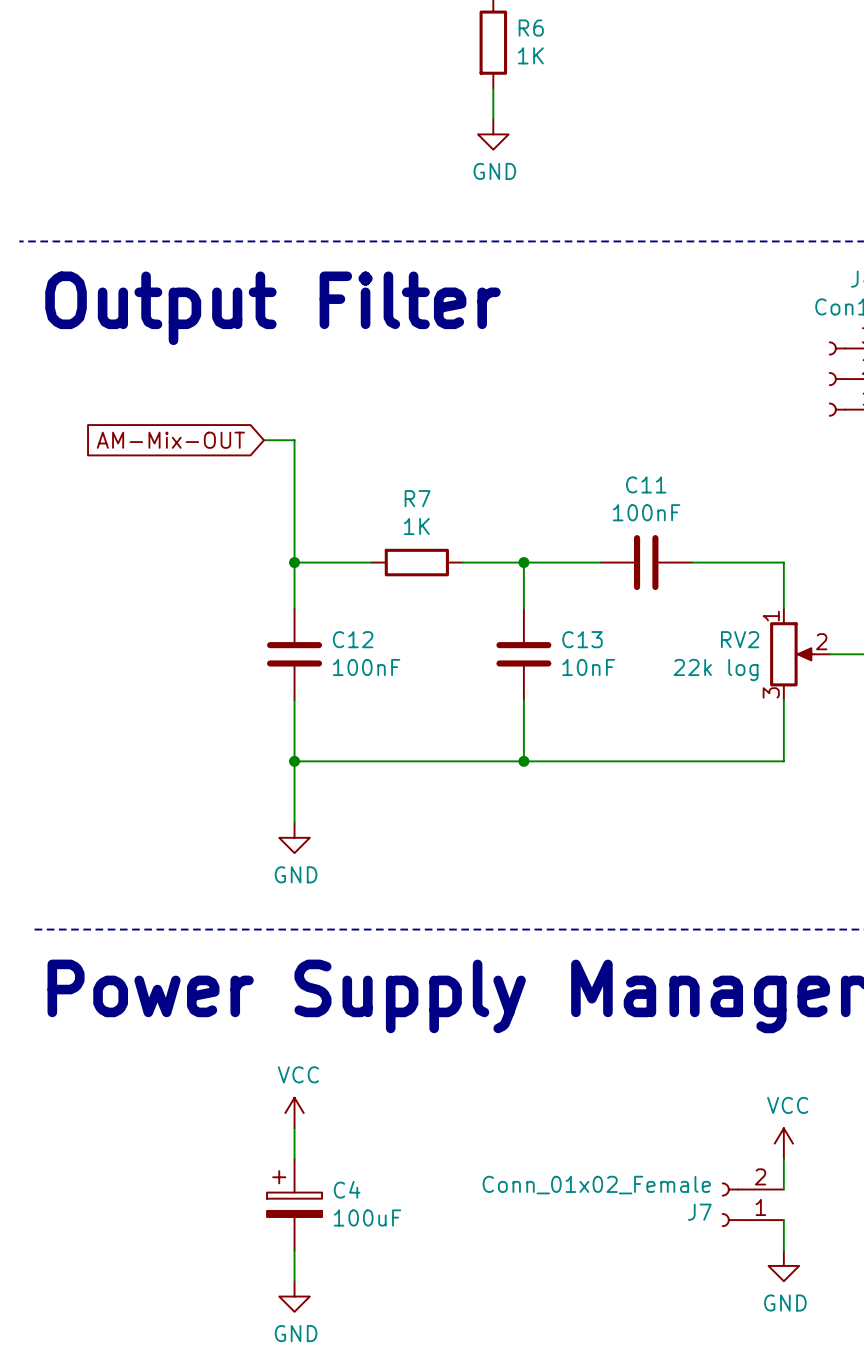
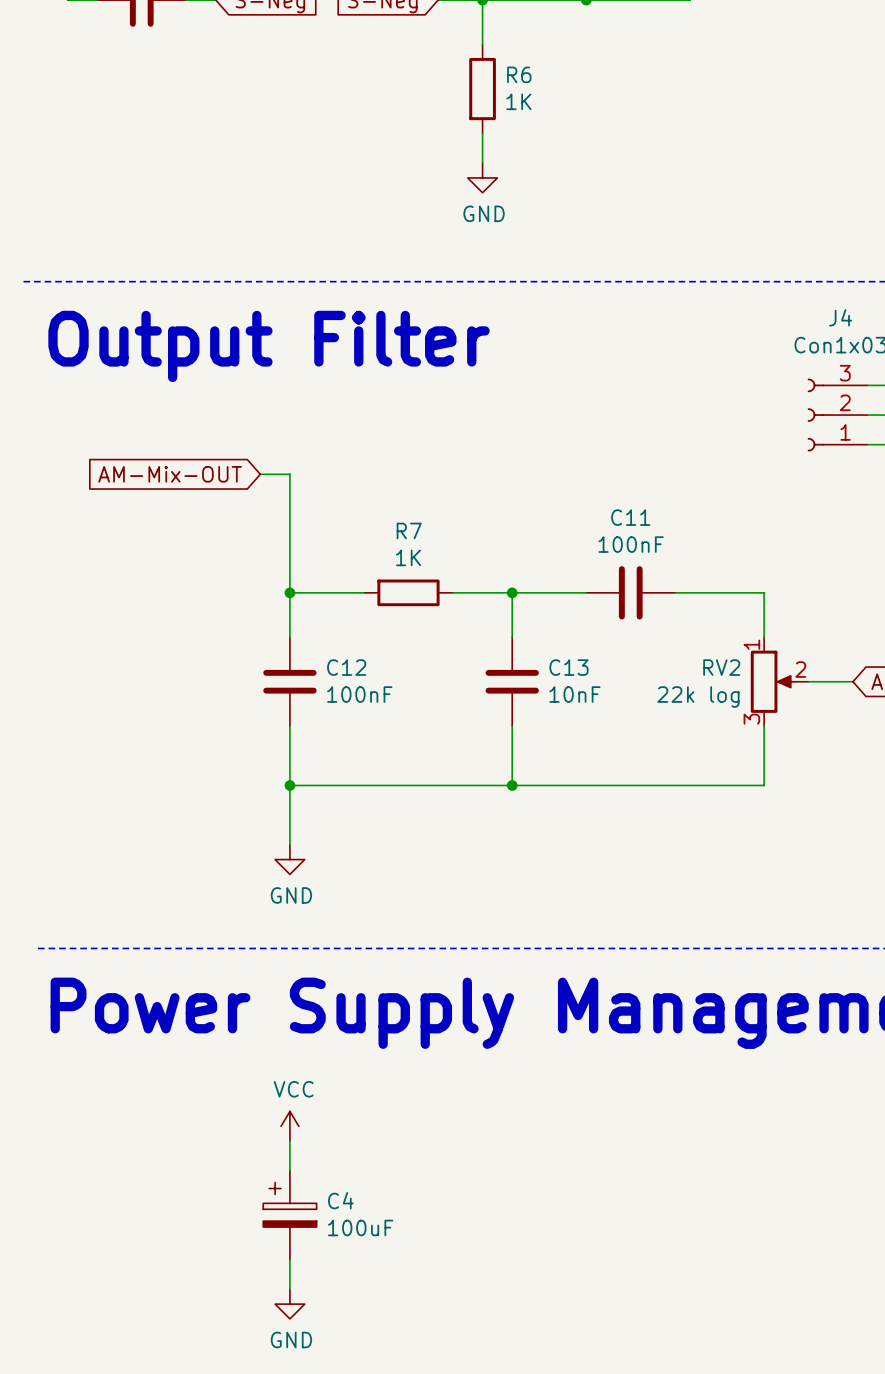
power symbol: VCC (783, 1143) -> none
wire: (783, 1158) (783, 1189) -> none
J7: Conn_01x02_Female (752, 1204) -> none
wire: (783, 1220) (783, 1250) -> none
power symbol: GND (783, 1265) -> none

